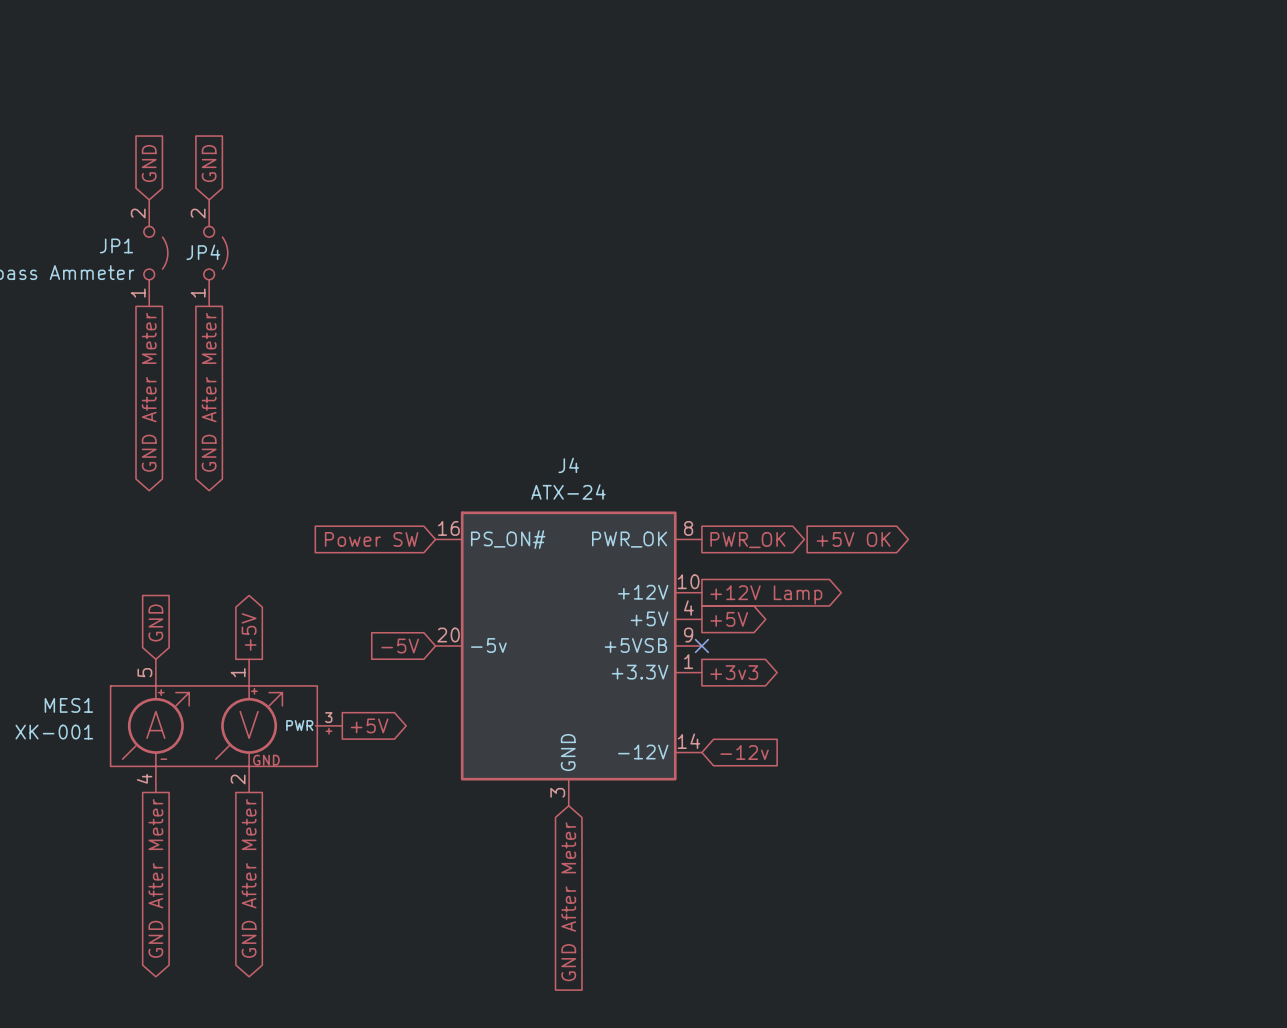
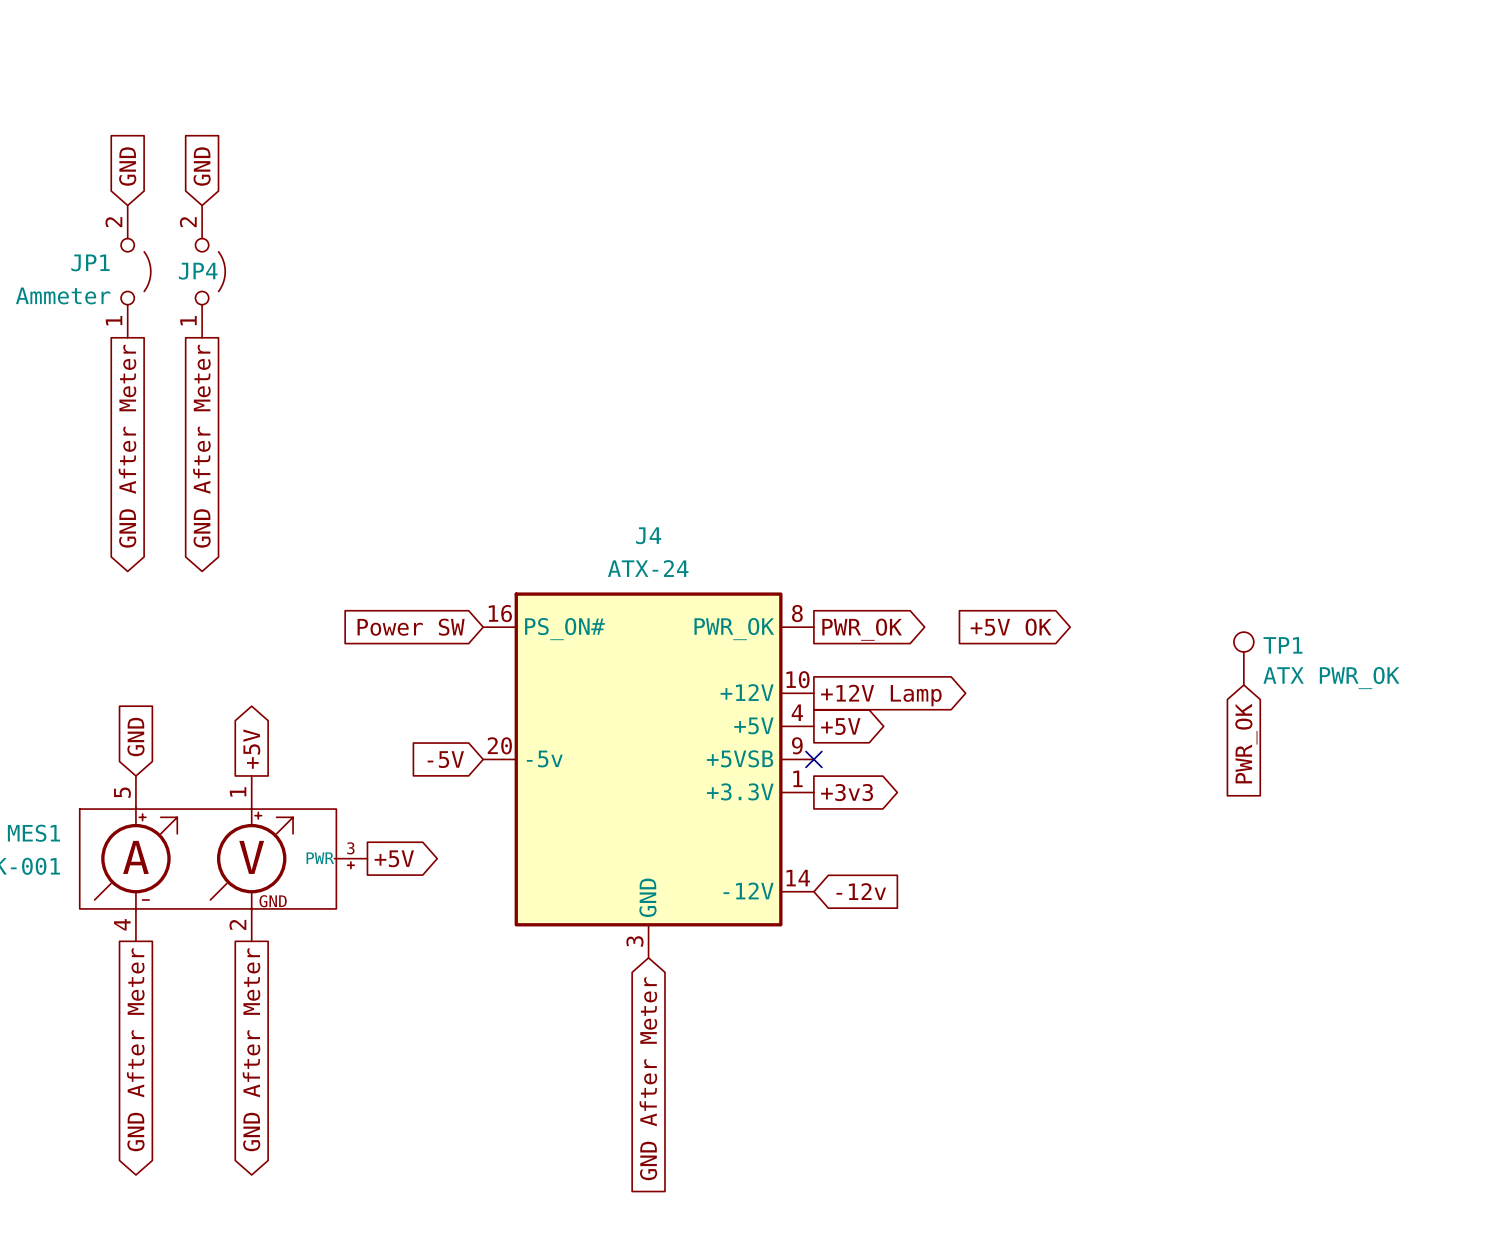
TP1: none -> ATX PWR_OK (1243, 658)
global label: none -> PWR_OK (1246, 743)

